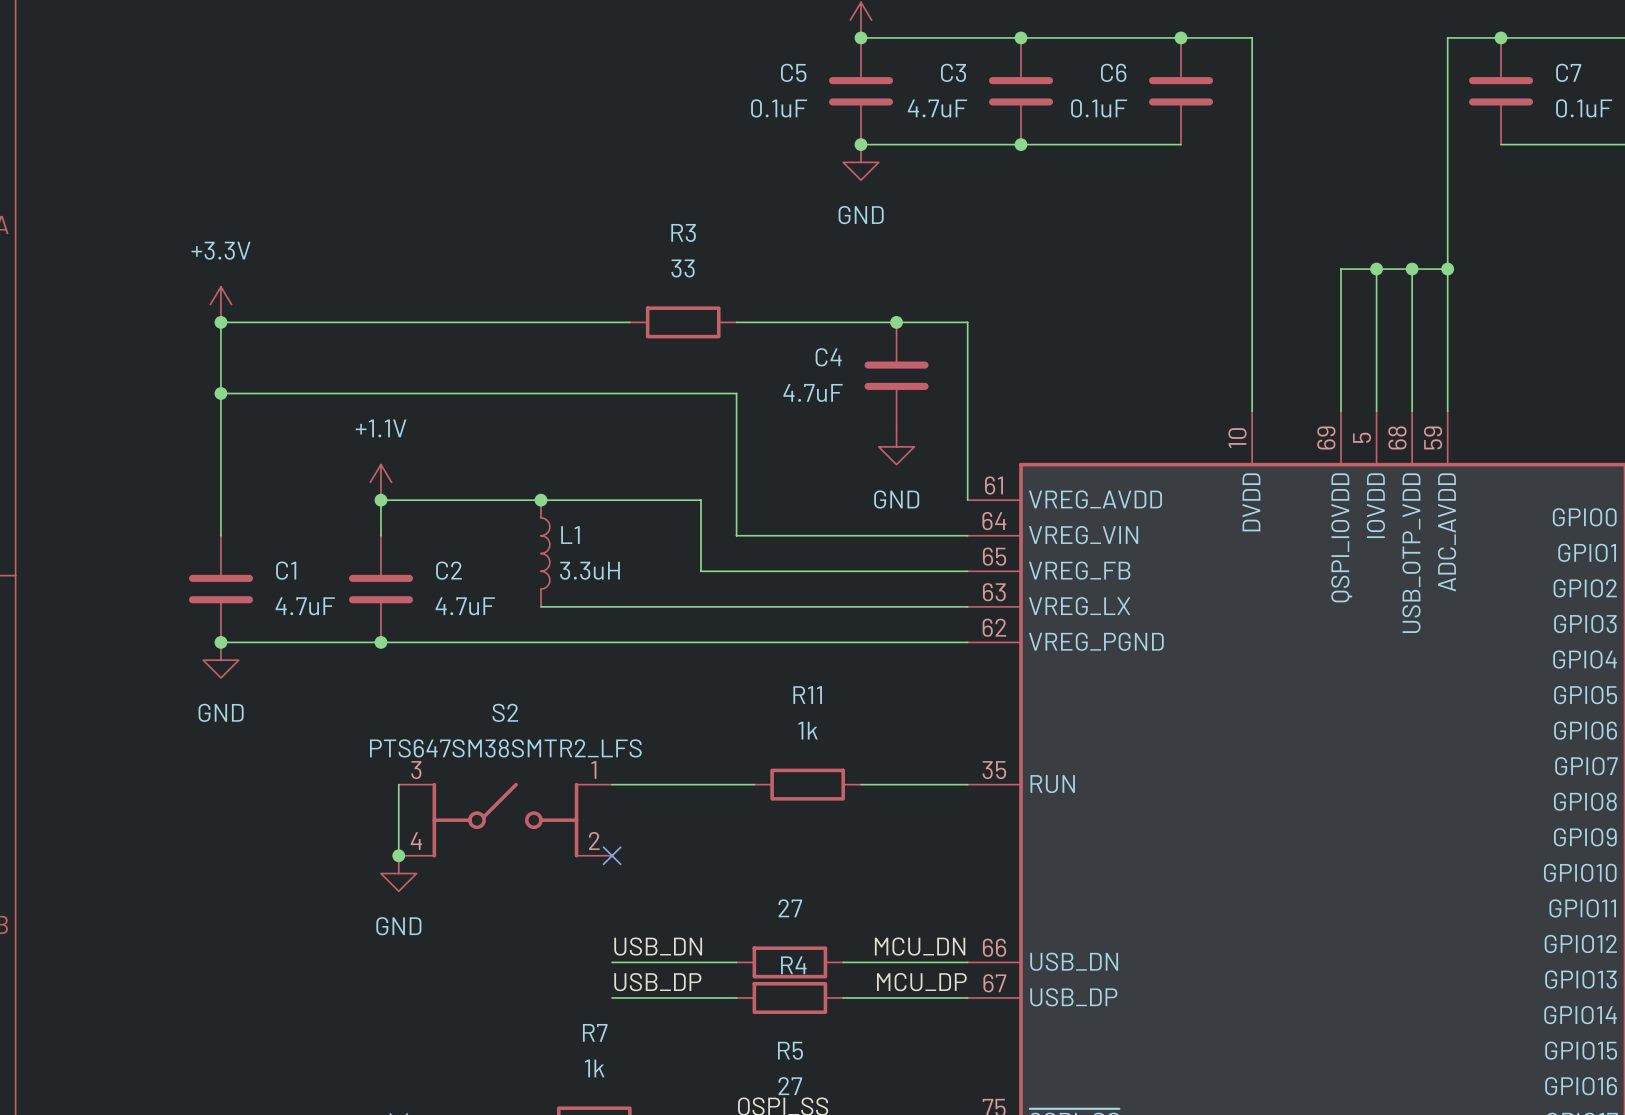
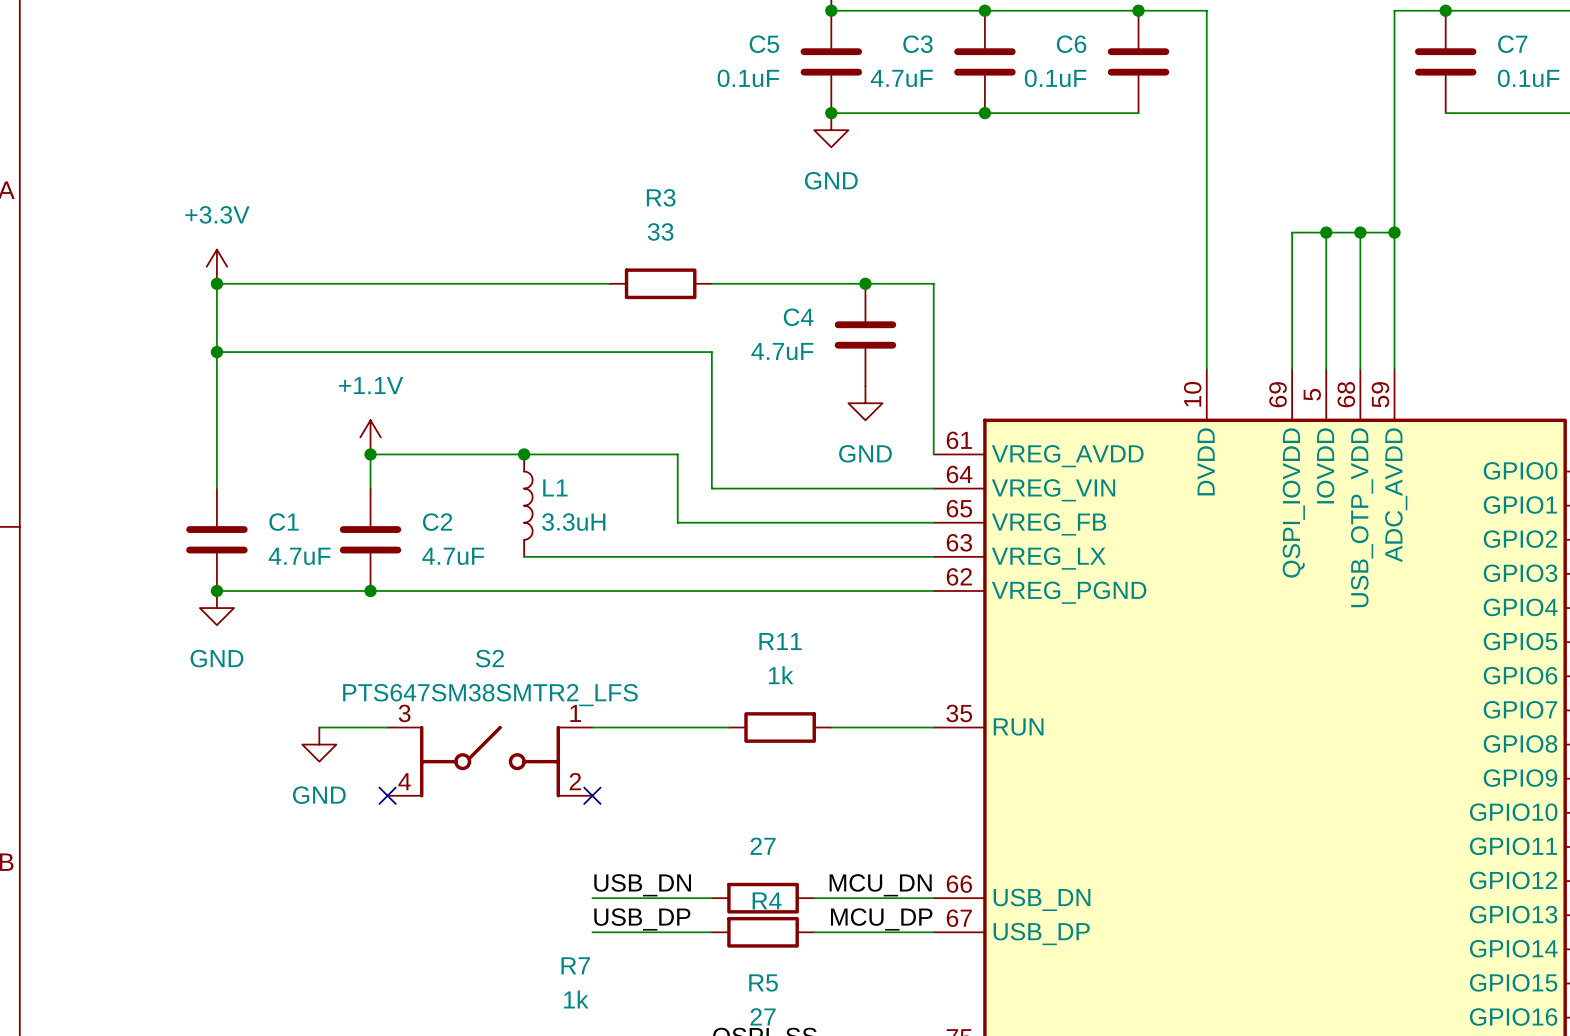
wire: (398, 784) (398, 855) -> (387, 727) (319, 727)
junction: (398, 855) -> none
no-connect mark: none -> (387, 795)
power symbol position: GND (398, 873) -> GND (319, 744)

